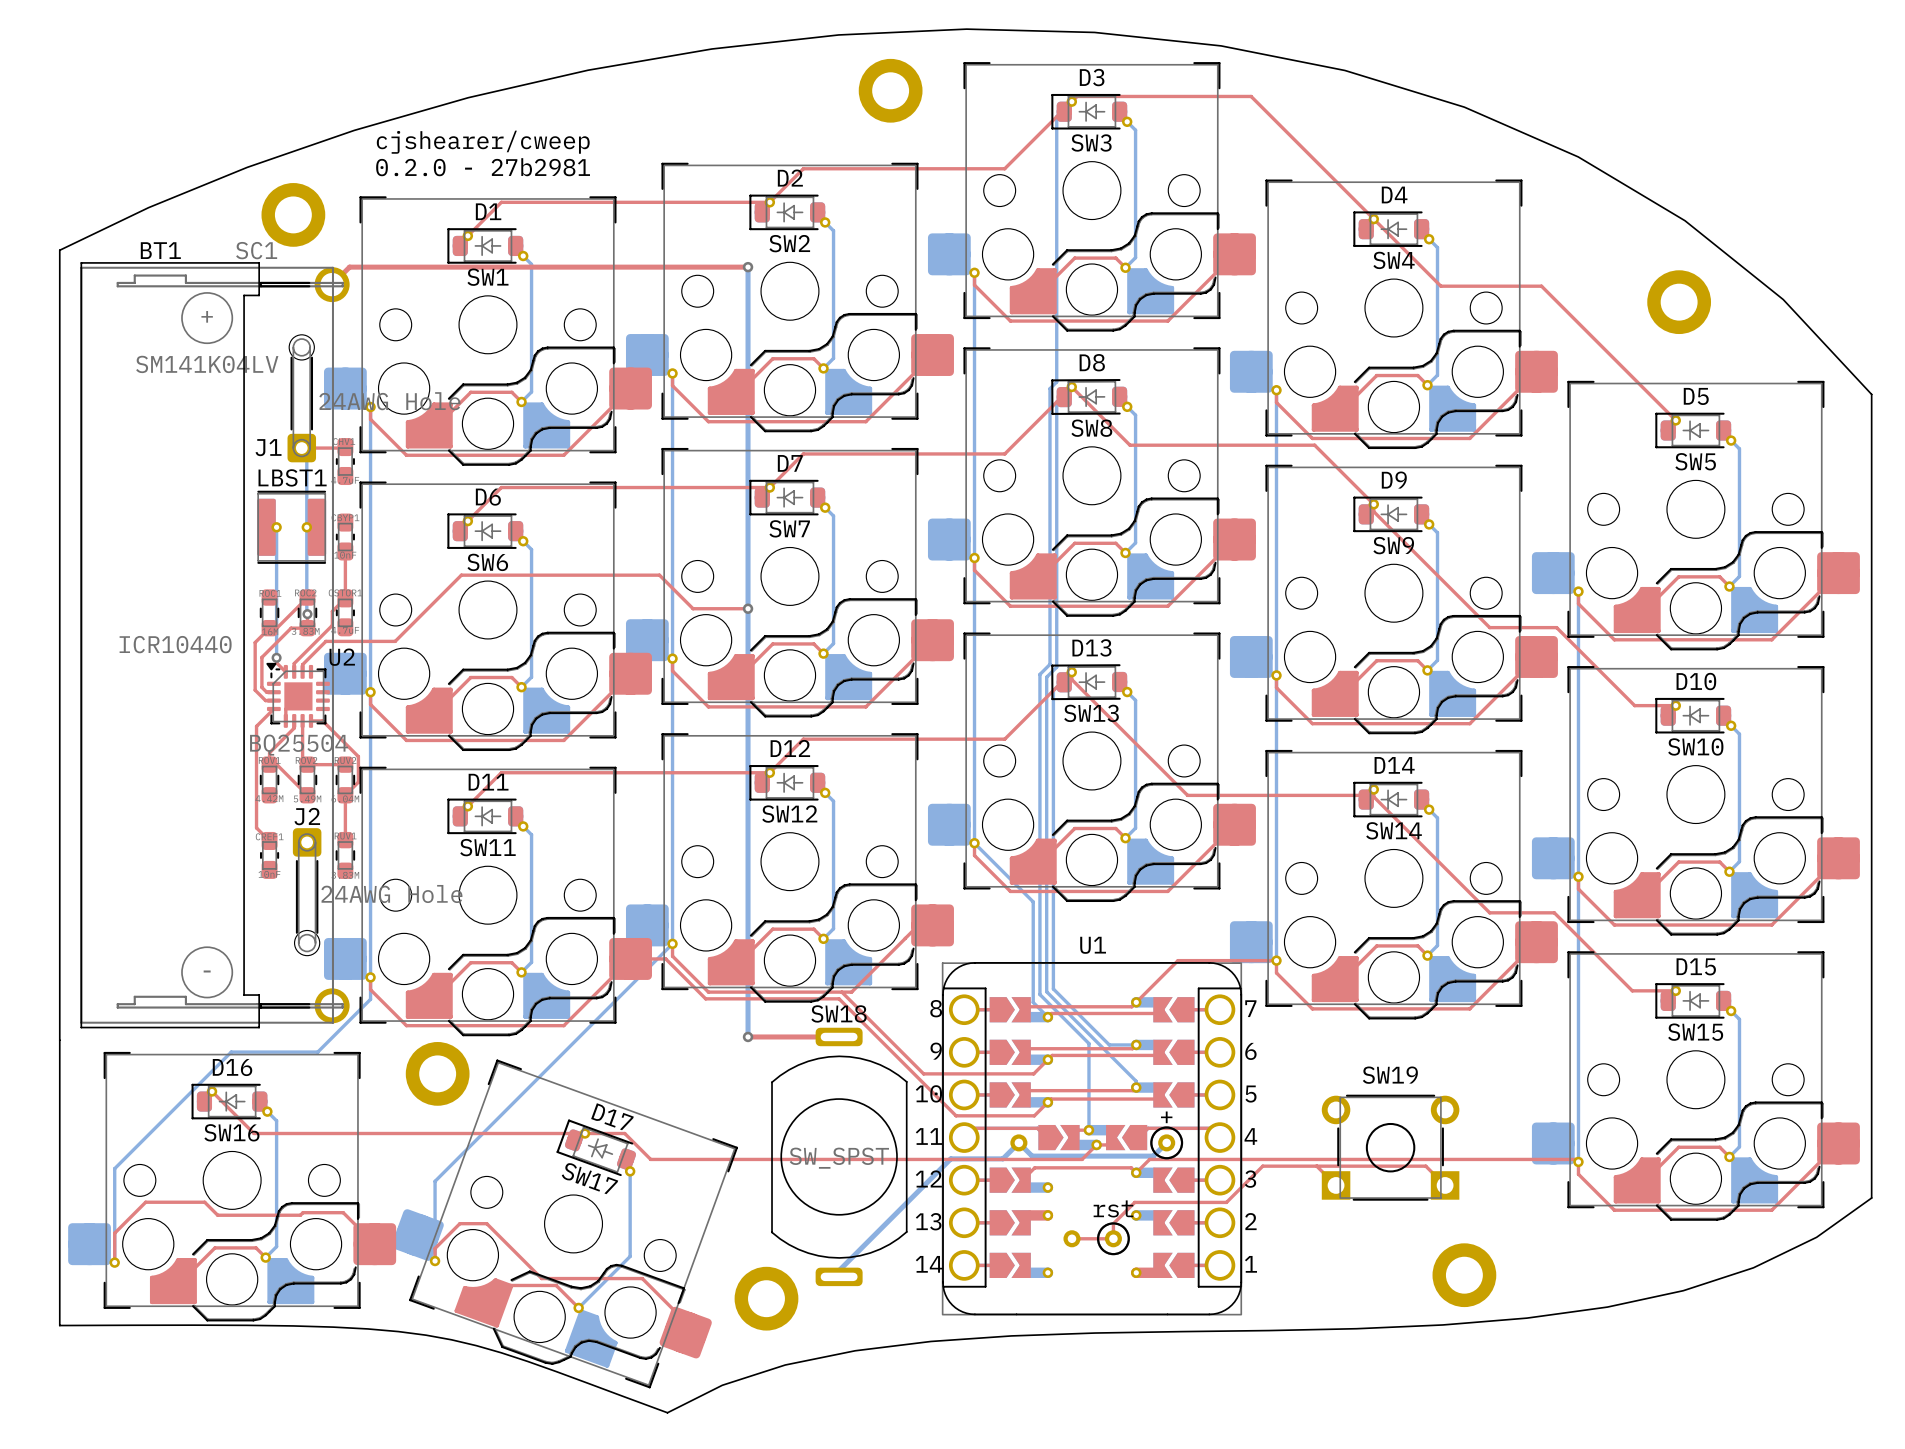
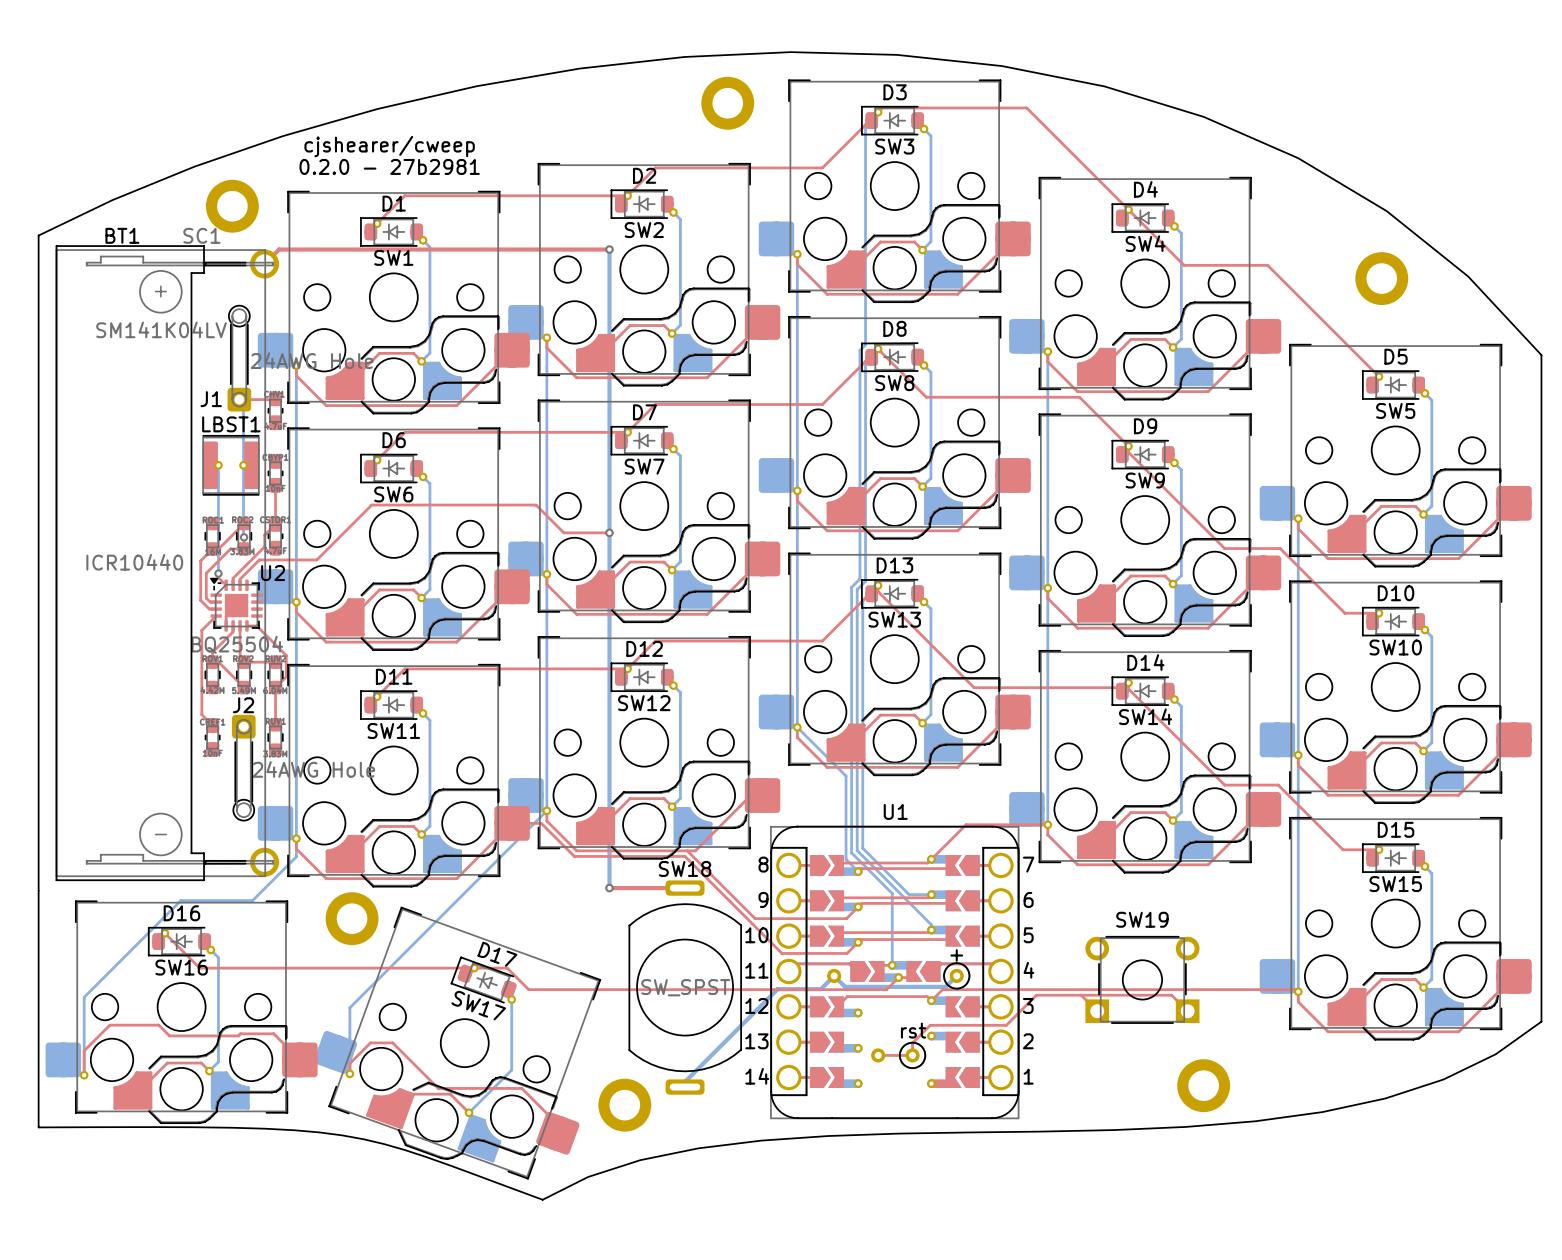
part side: bottom (1021, 1222) -> top (836, 1042)

